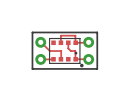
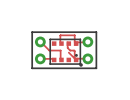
part footprint: [49, 38, 81, 64] -> [49, 38, 81, 65]

